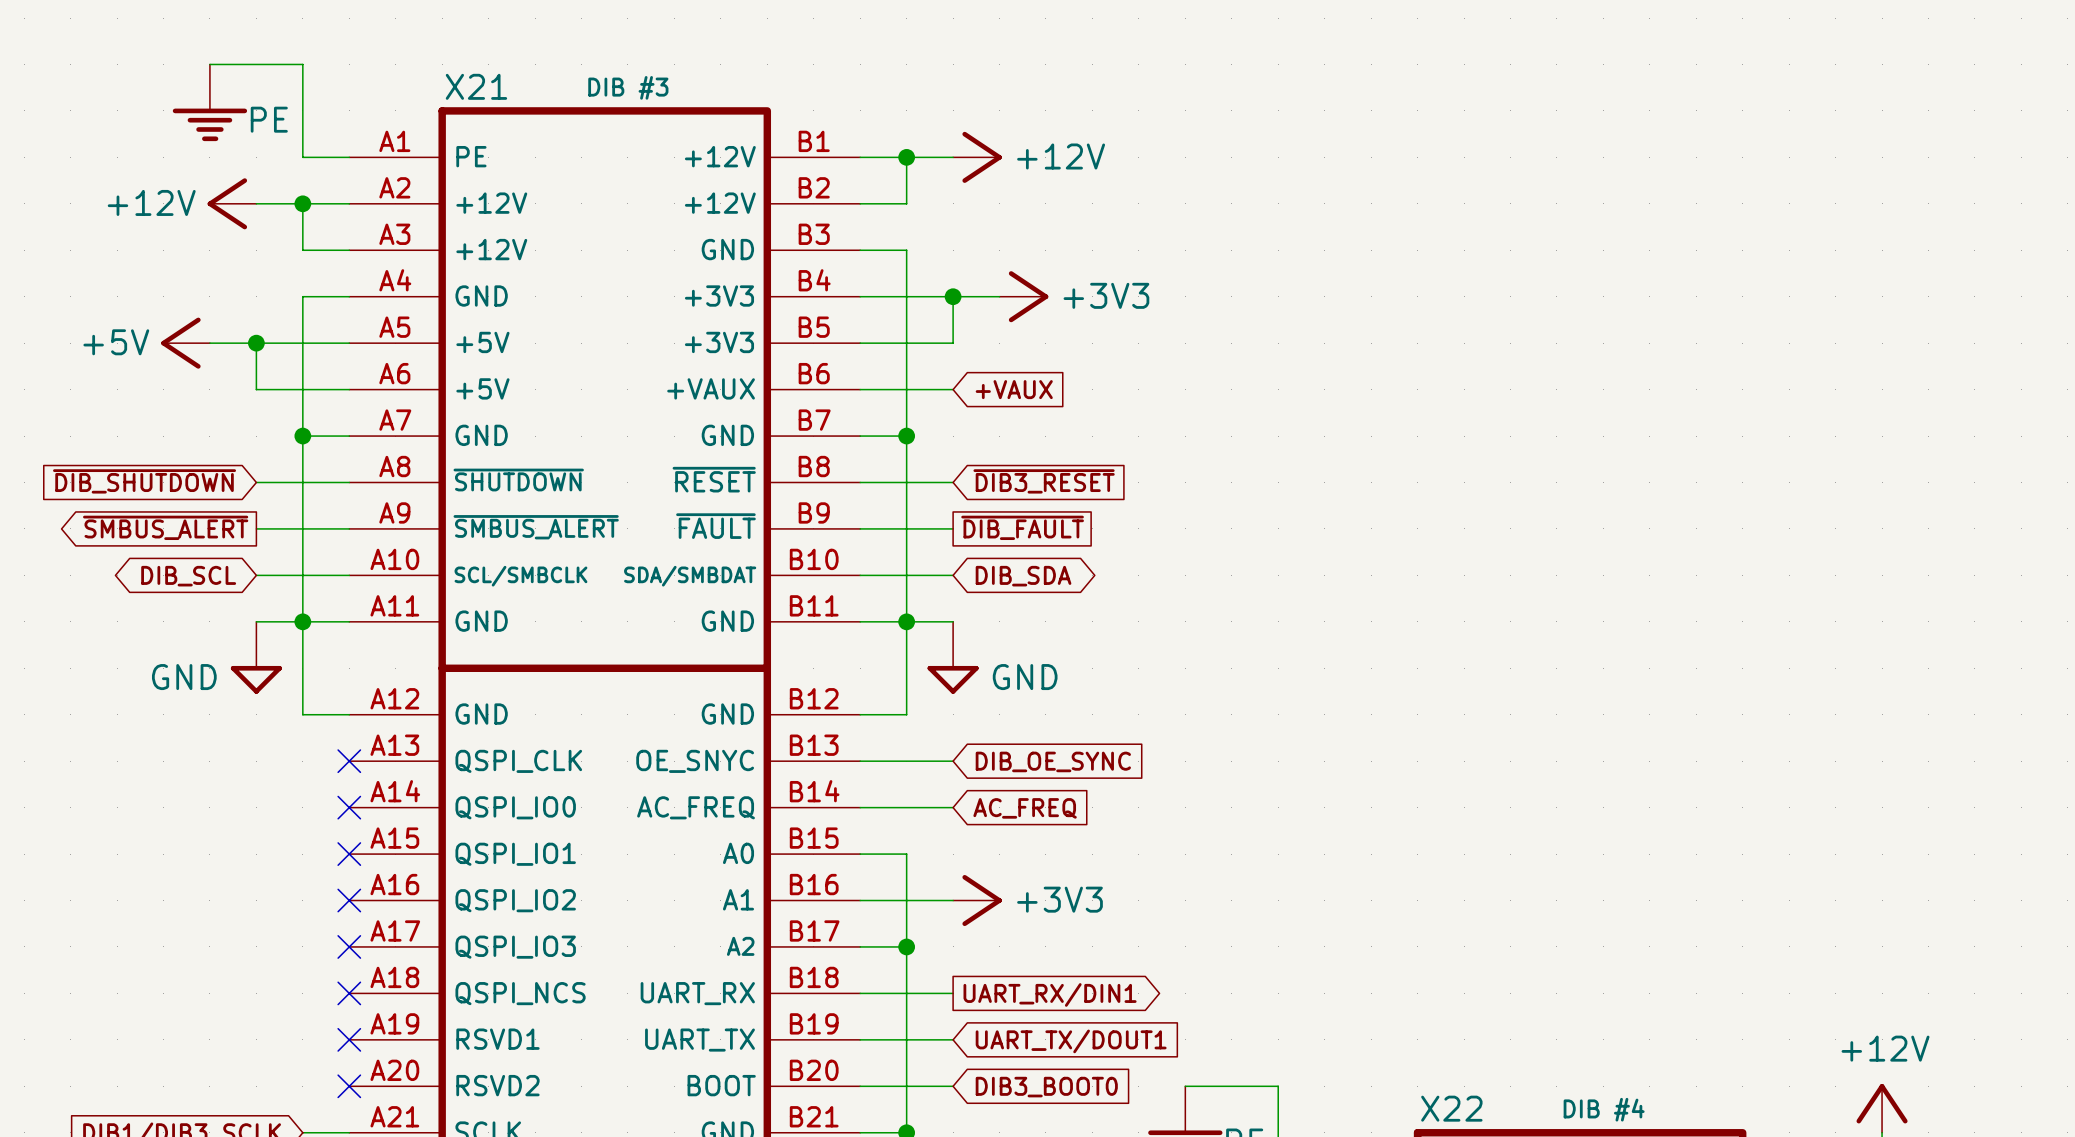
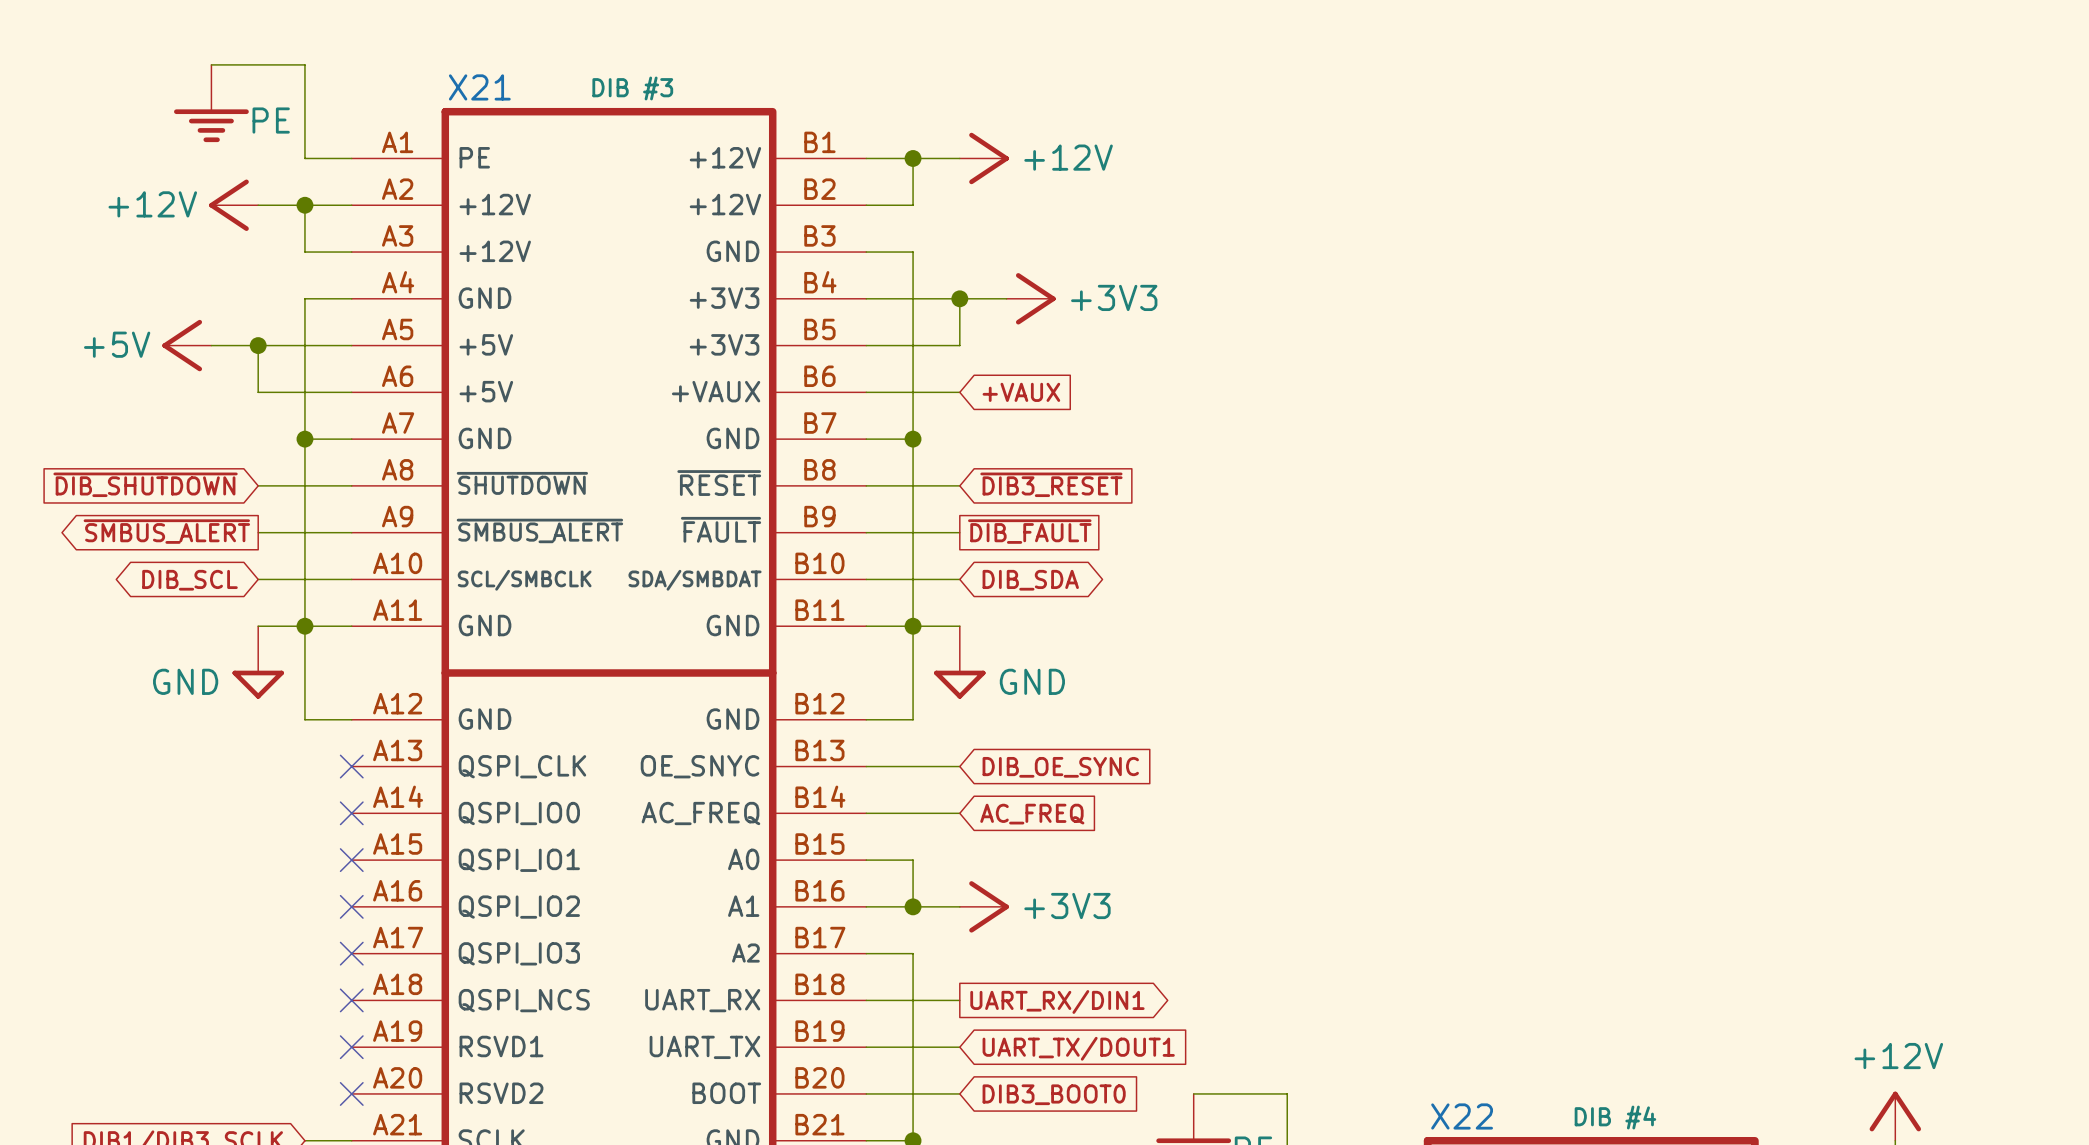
wire: (906, 900) (906, 946) -> none
junction position: (906, 946) -> (913, 906)

